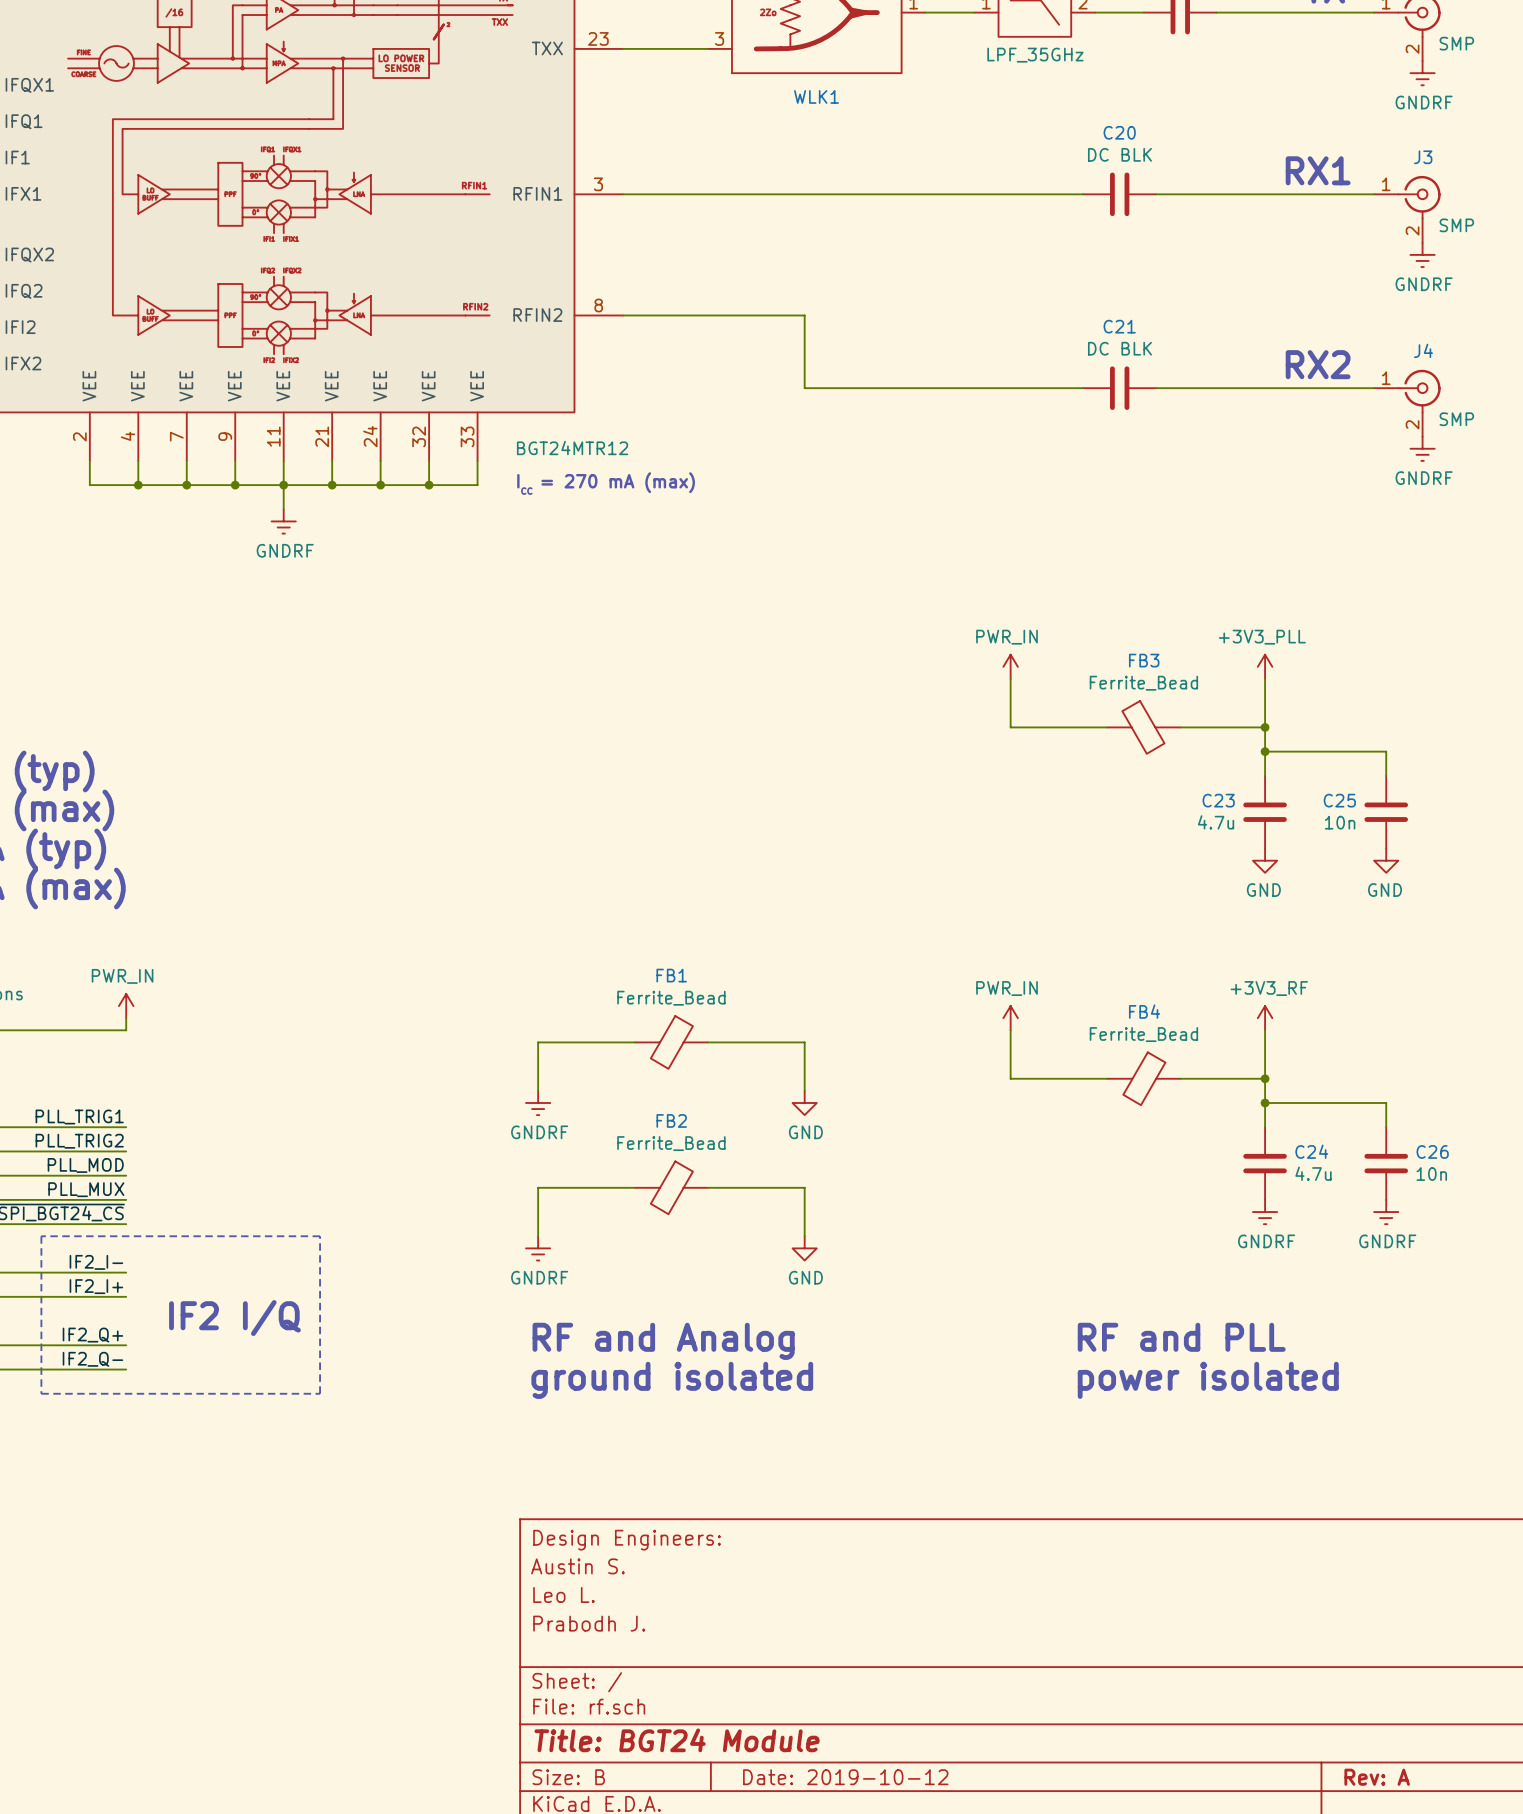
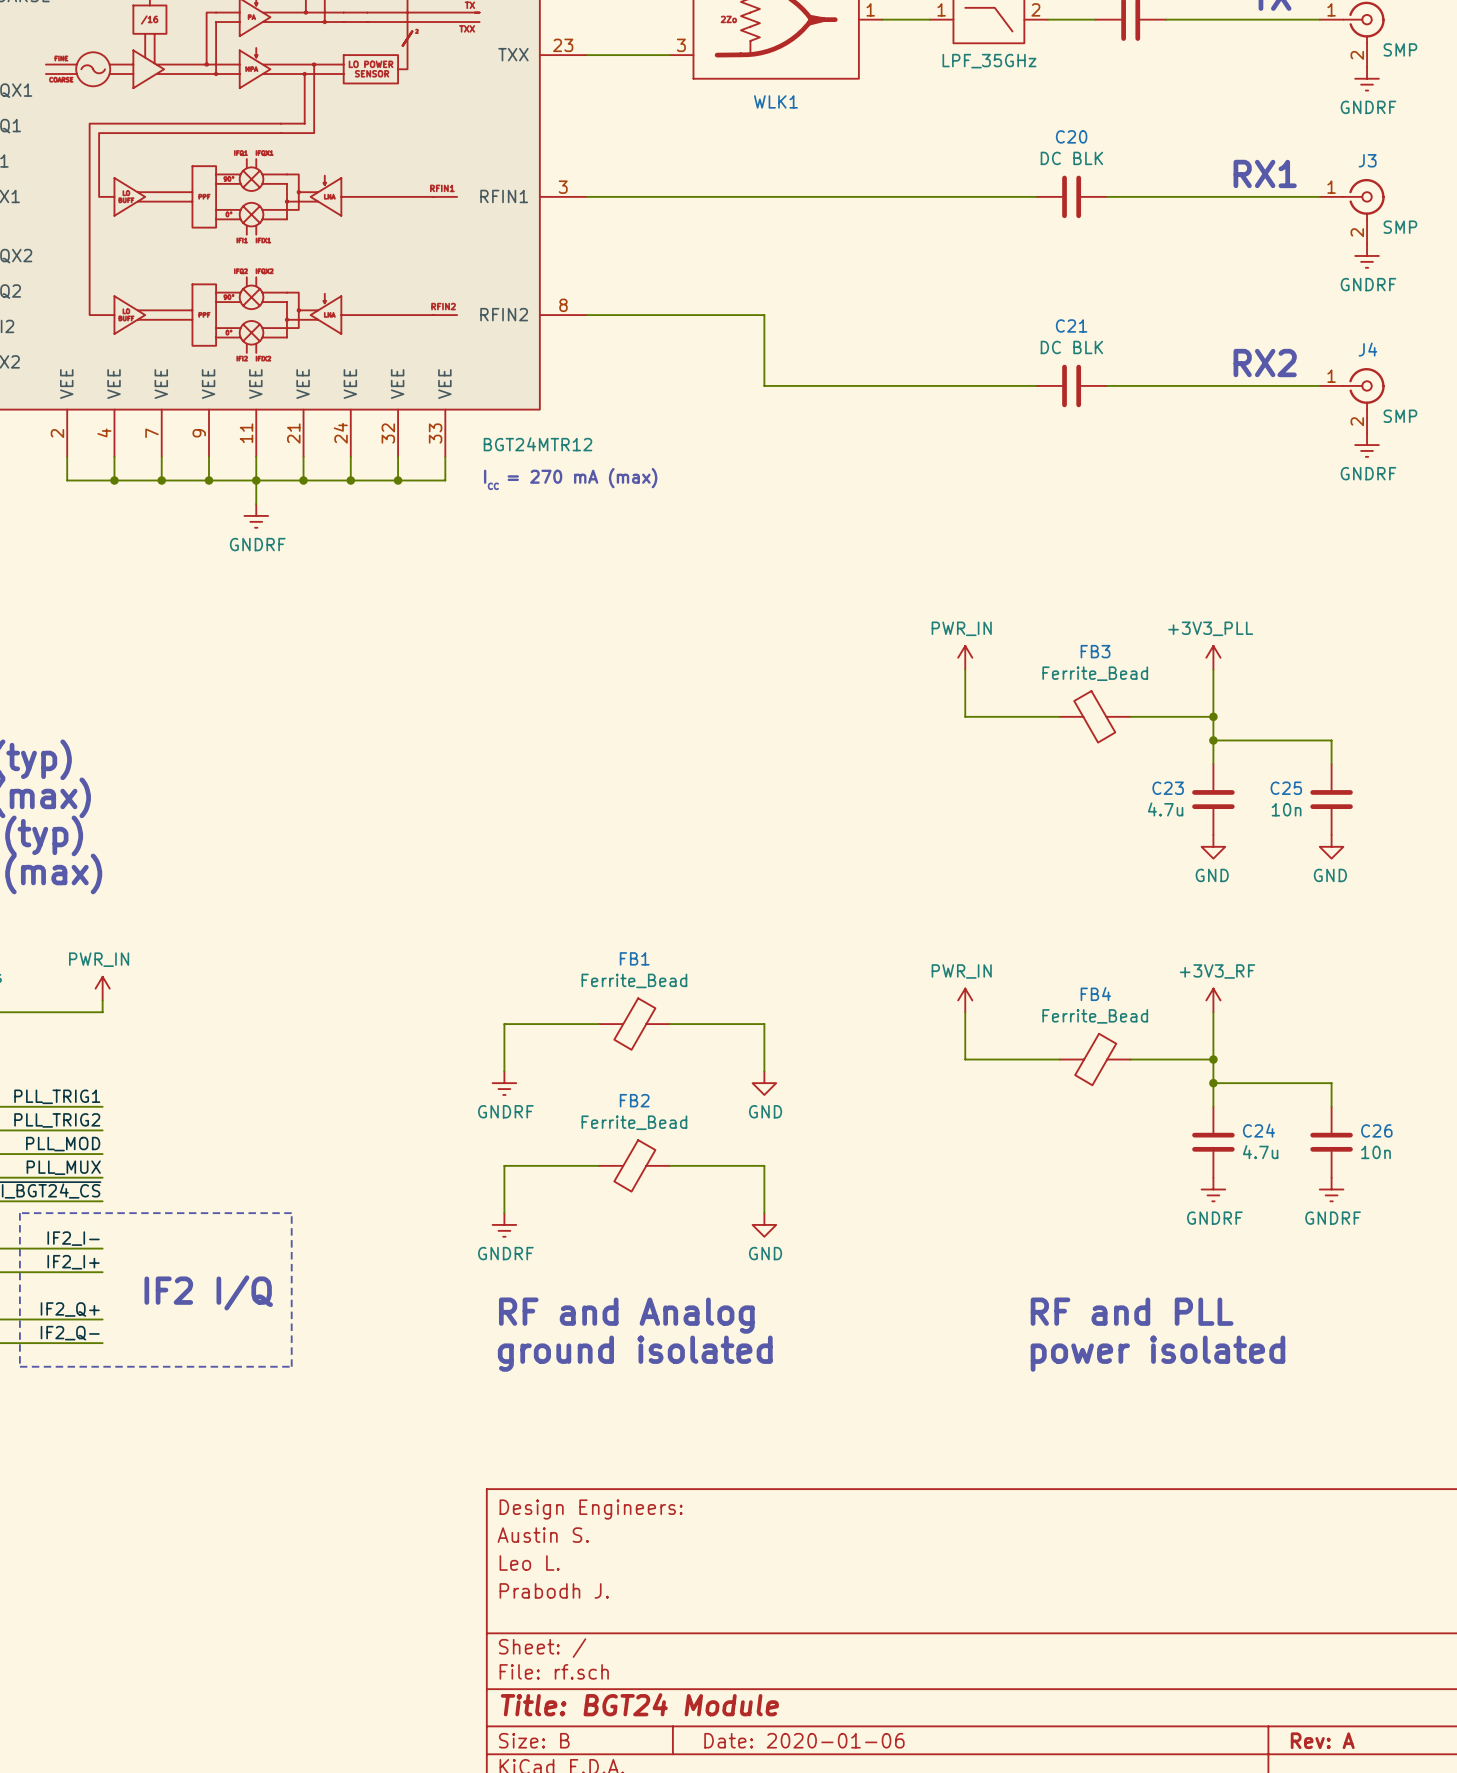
title block: Date: 2019-10-12 (845, 1777) -> Date: 2020-01-06 (804, 1740)

